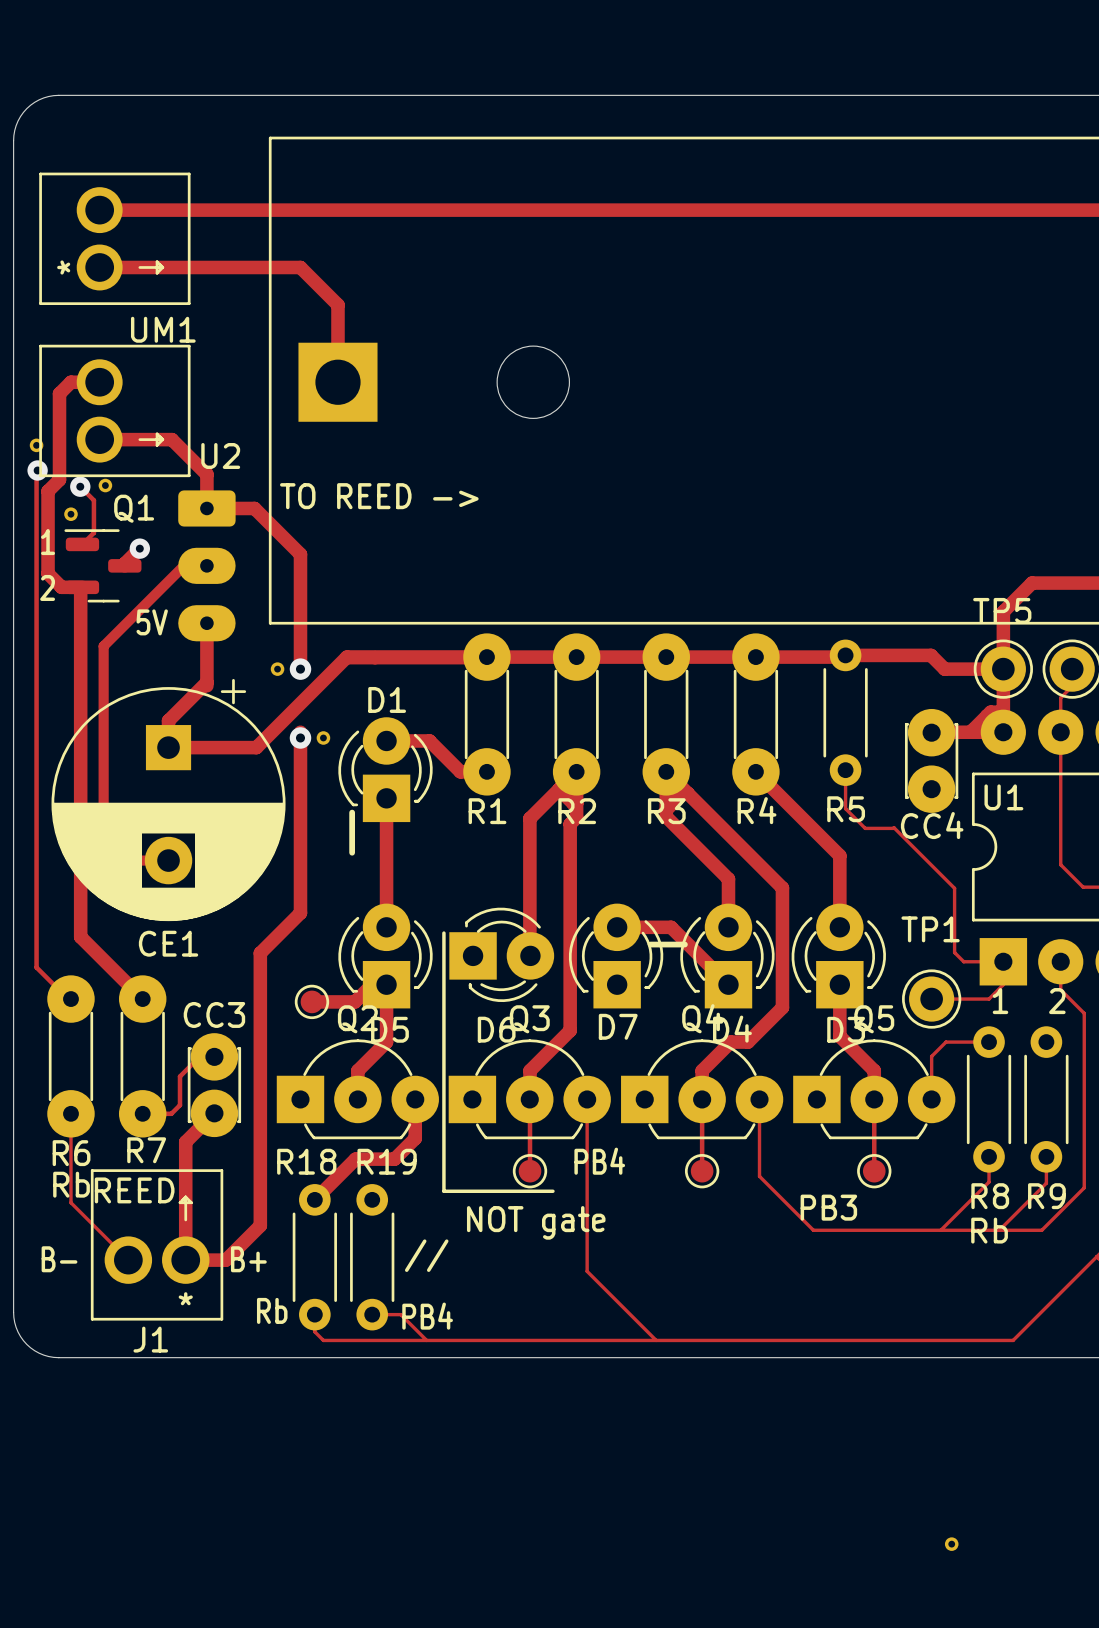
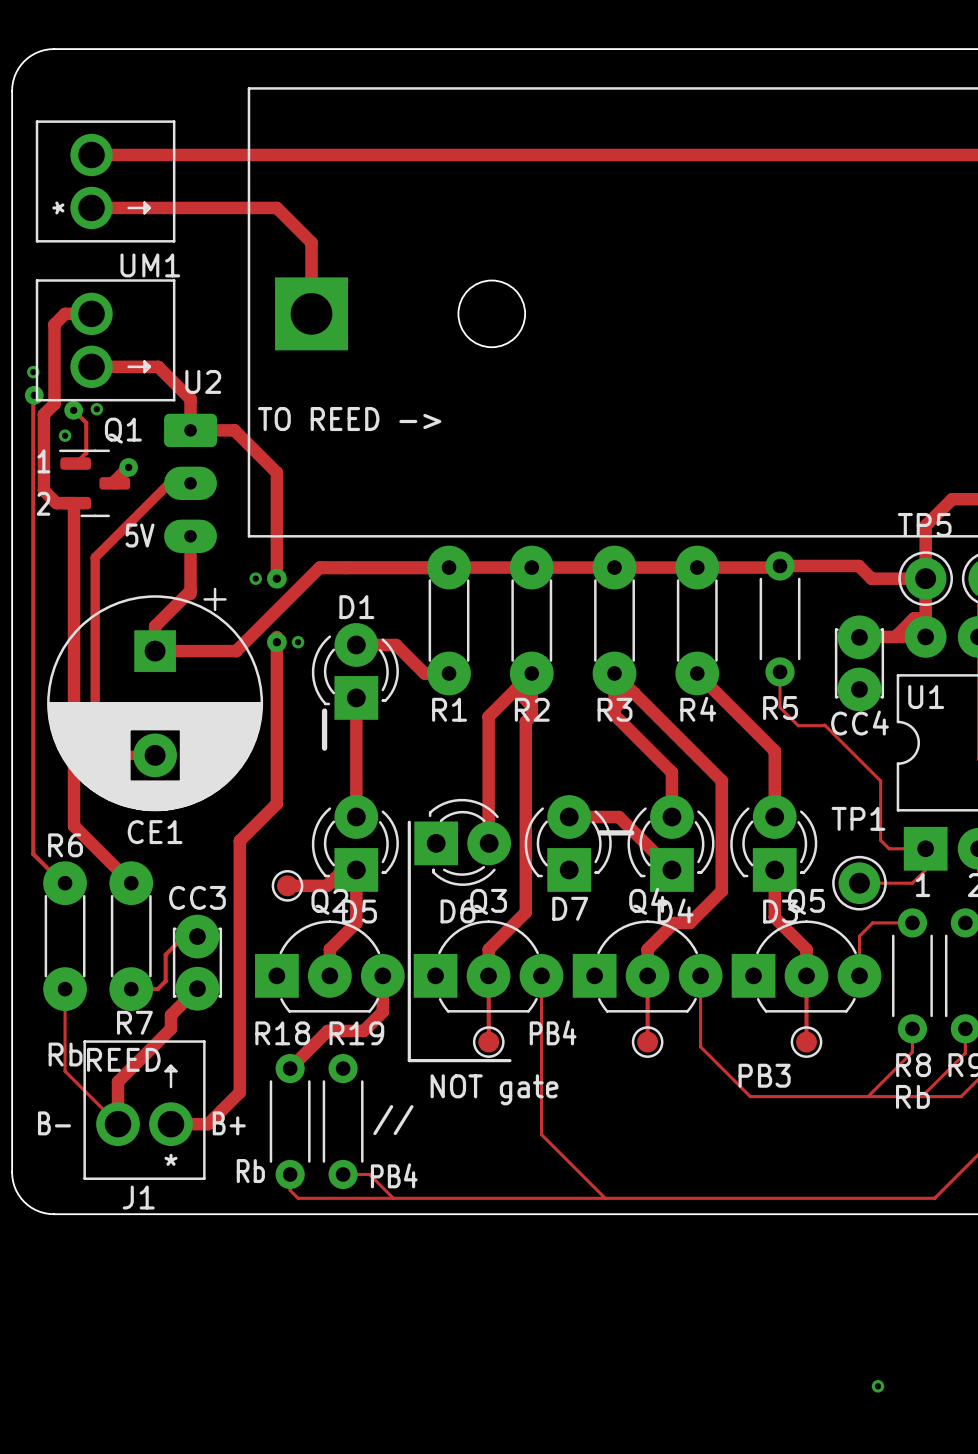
R6 name position: R6 (71, 1153) -> R6 (65, 845)
track: (185, 1156) (185, 1260) -> (170, 1028) (118, 1081) (118, 1124)

